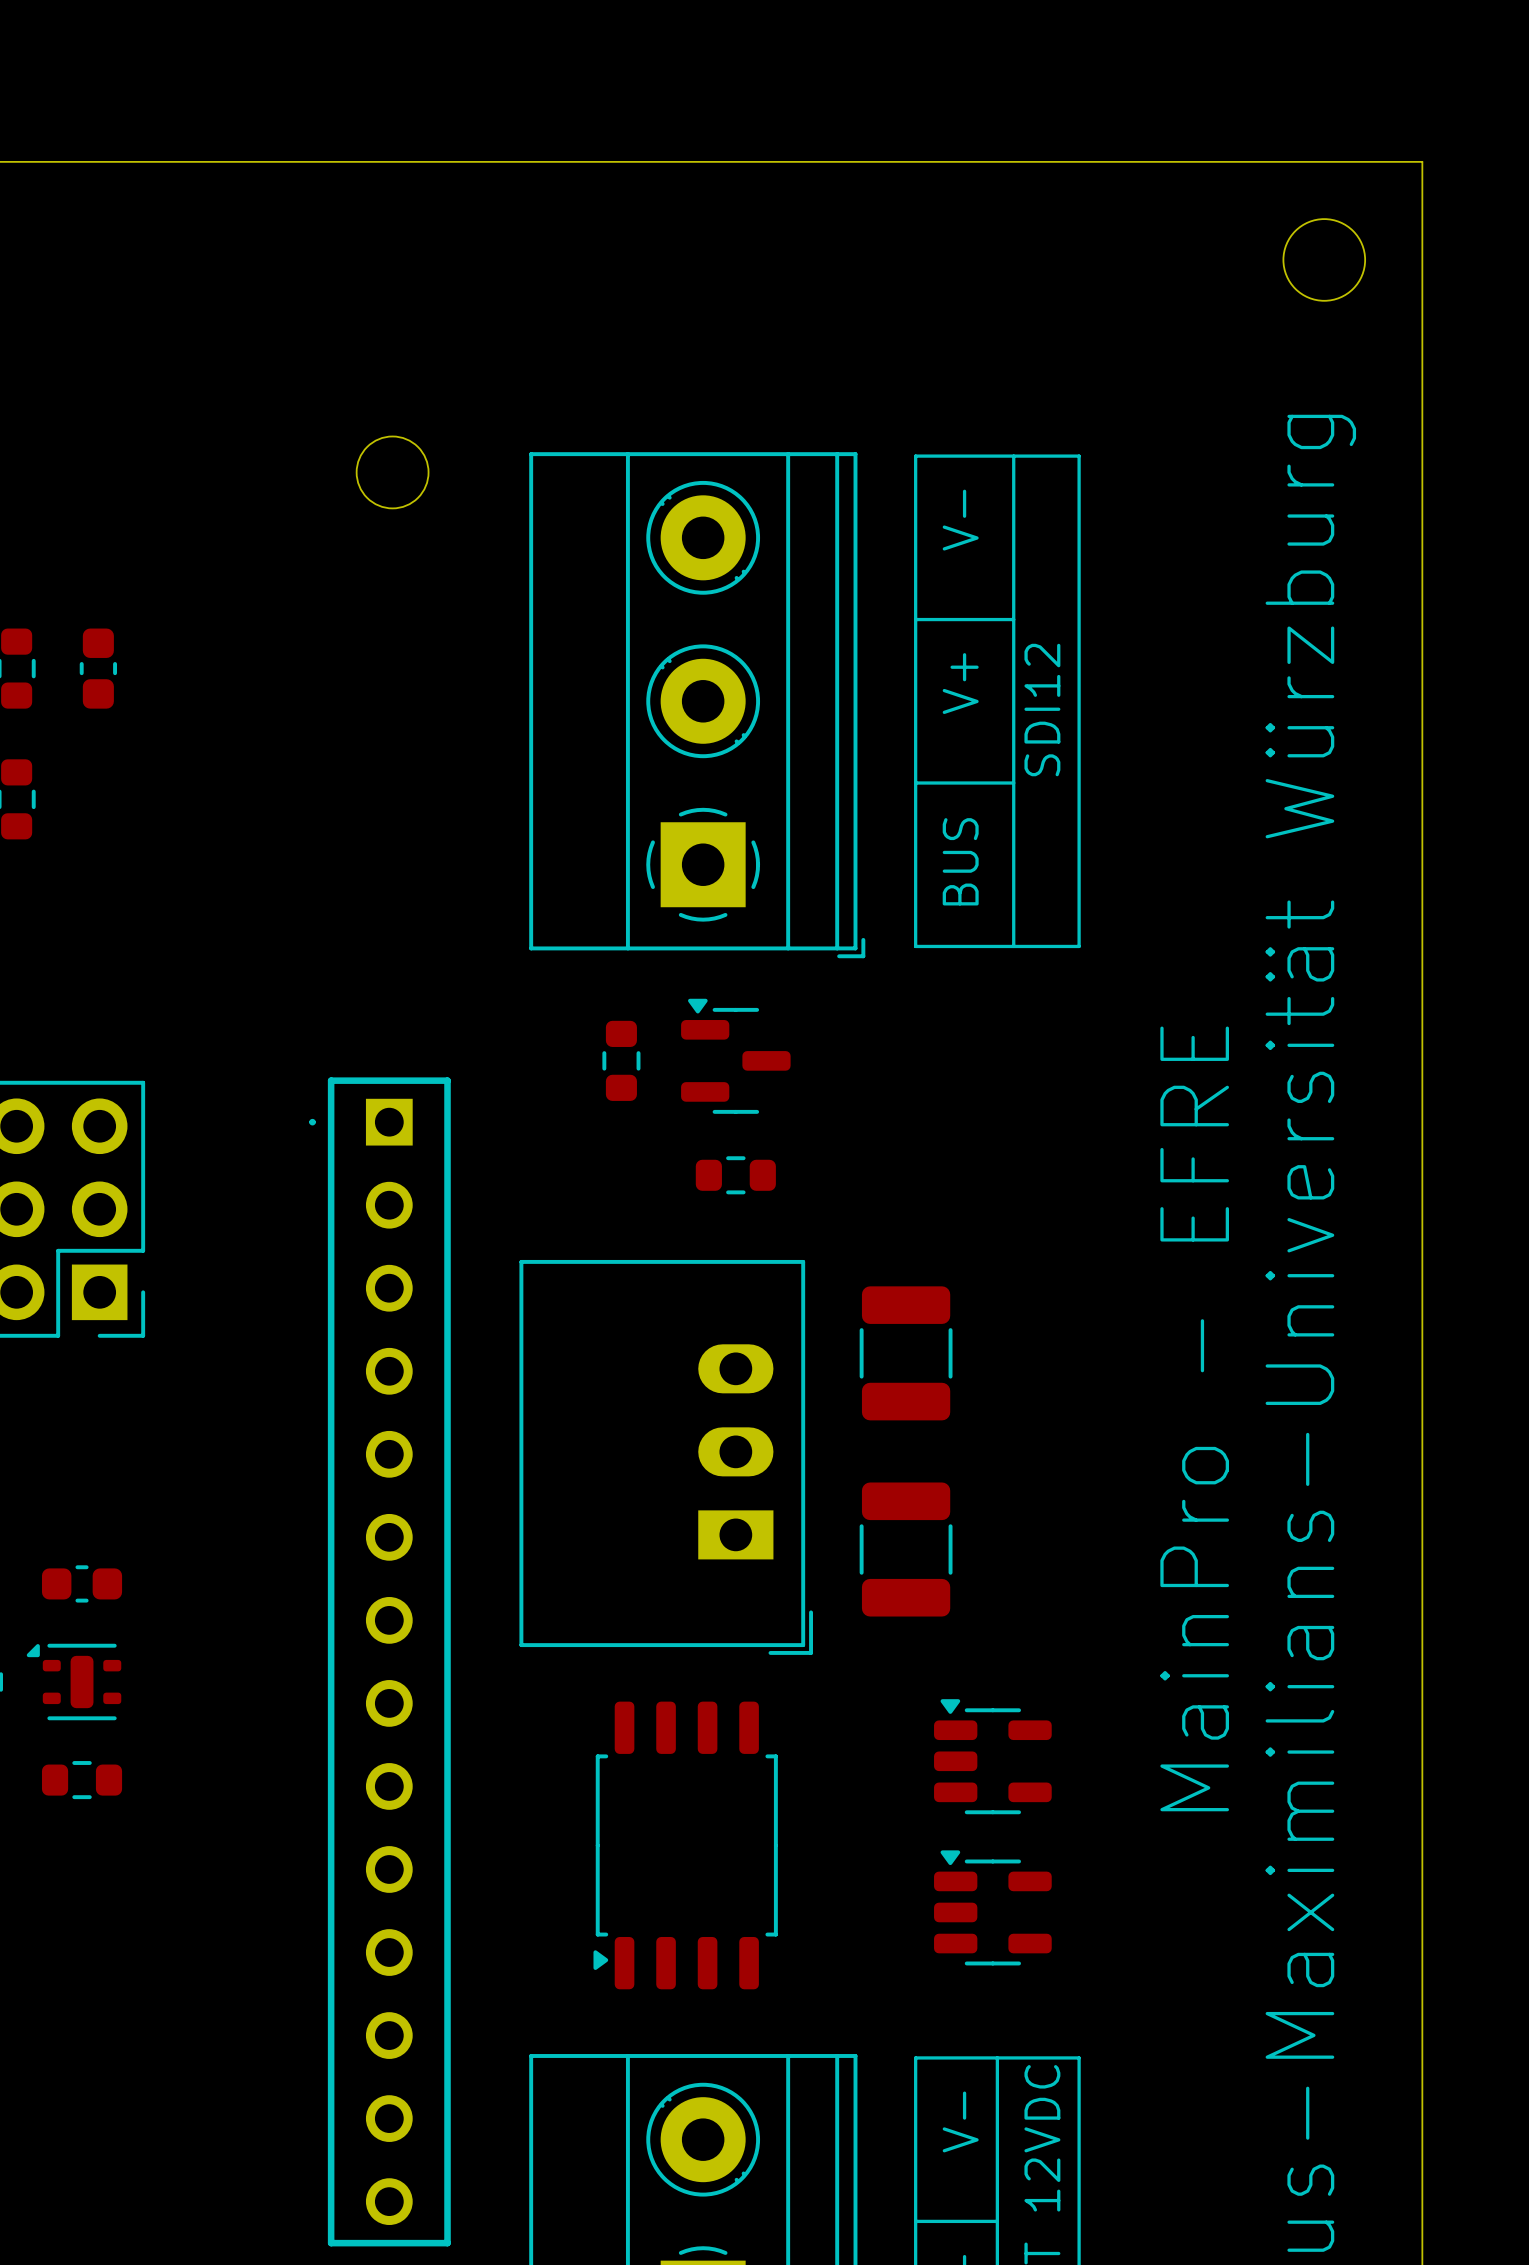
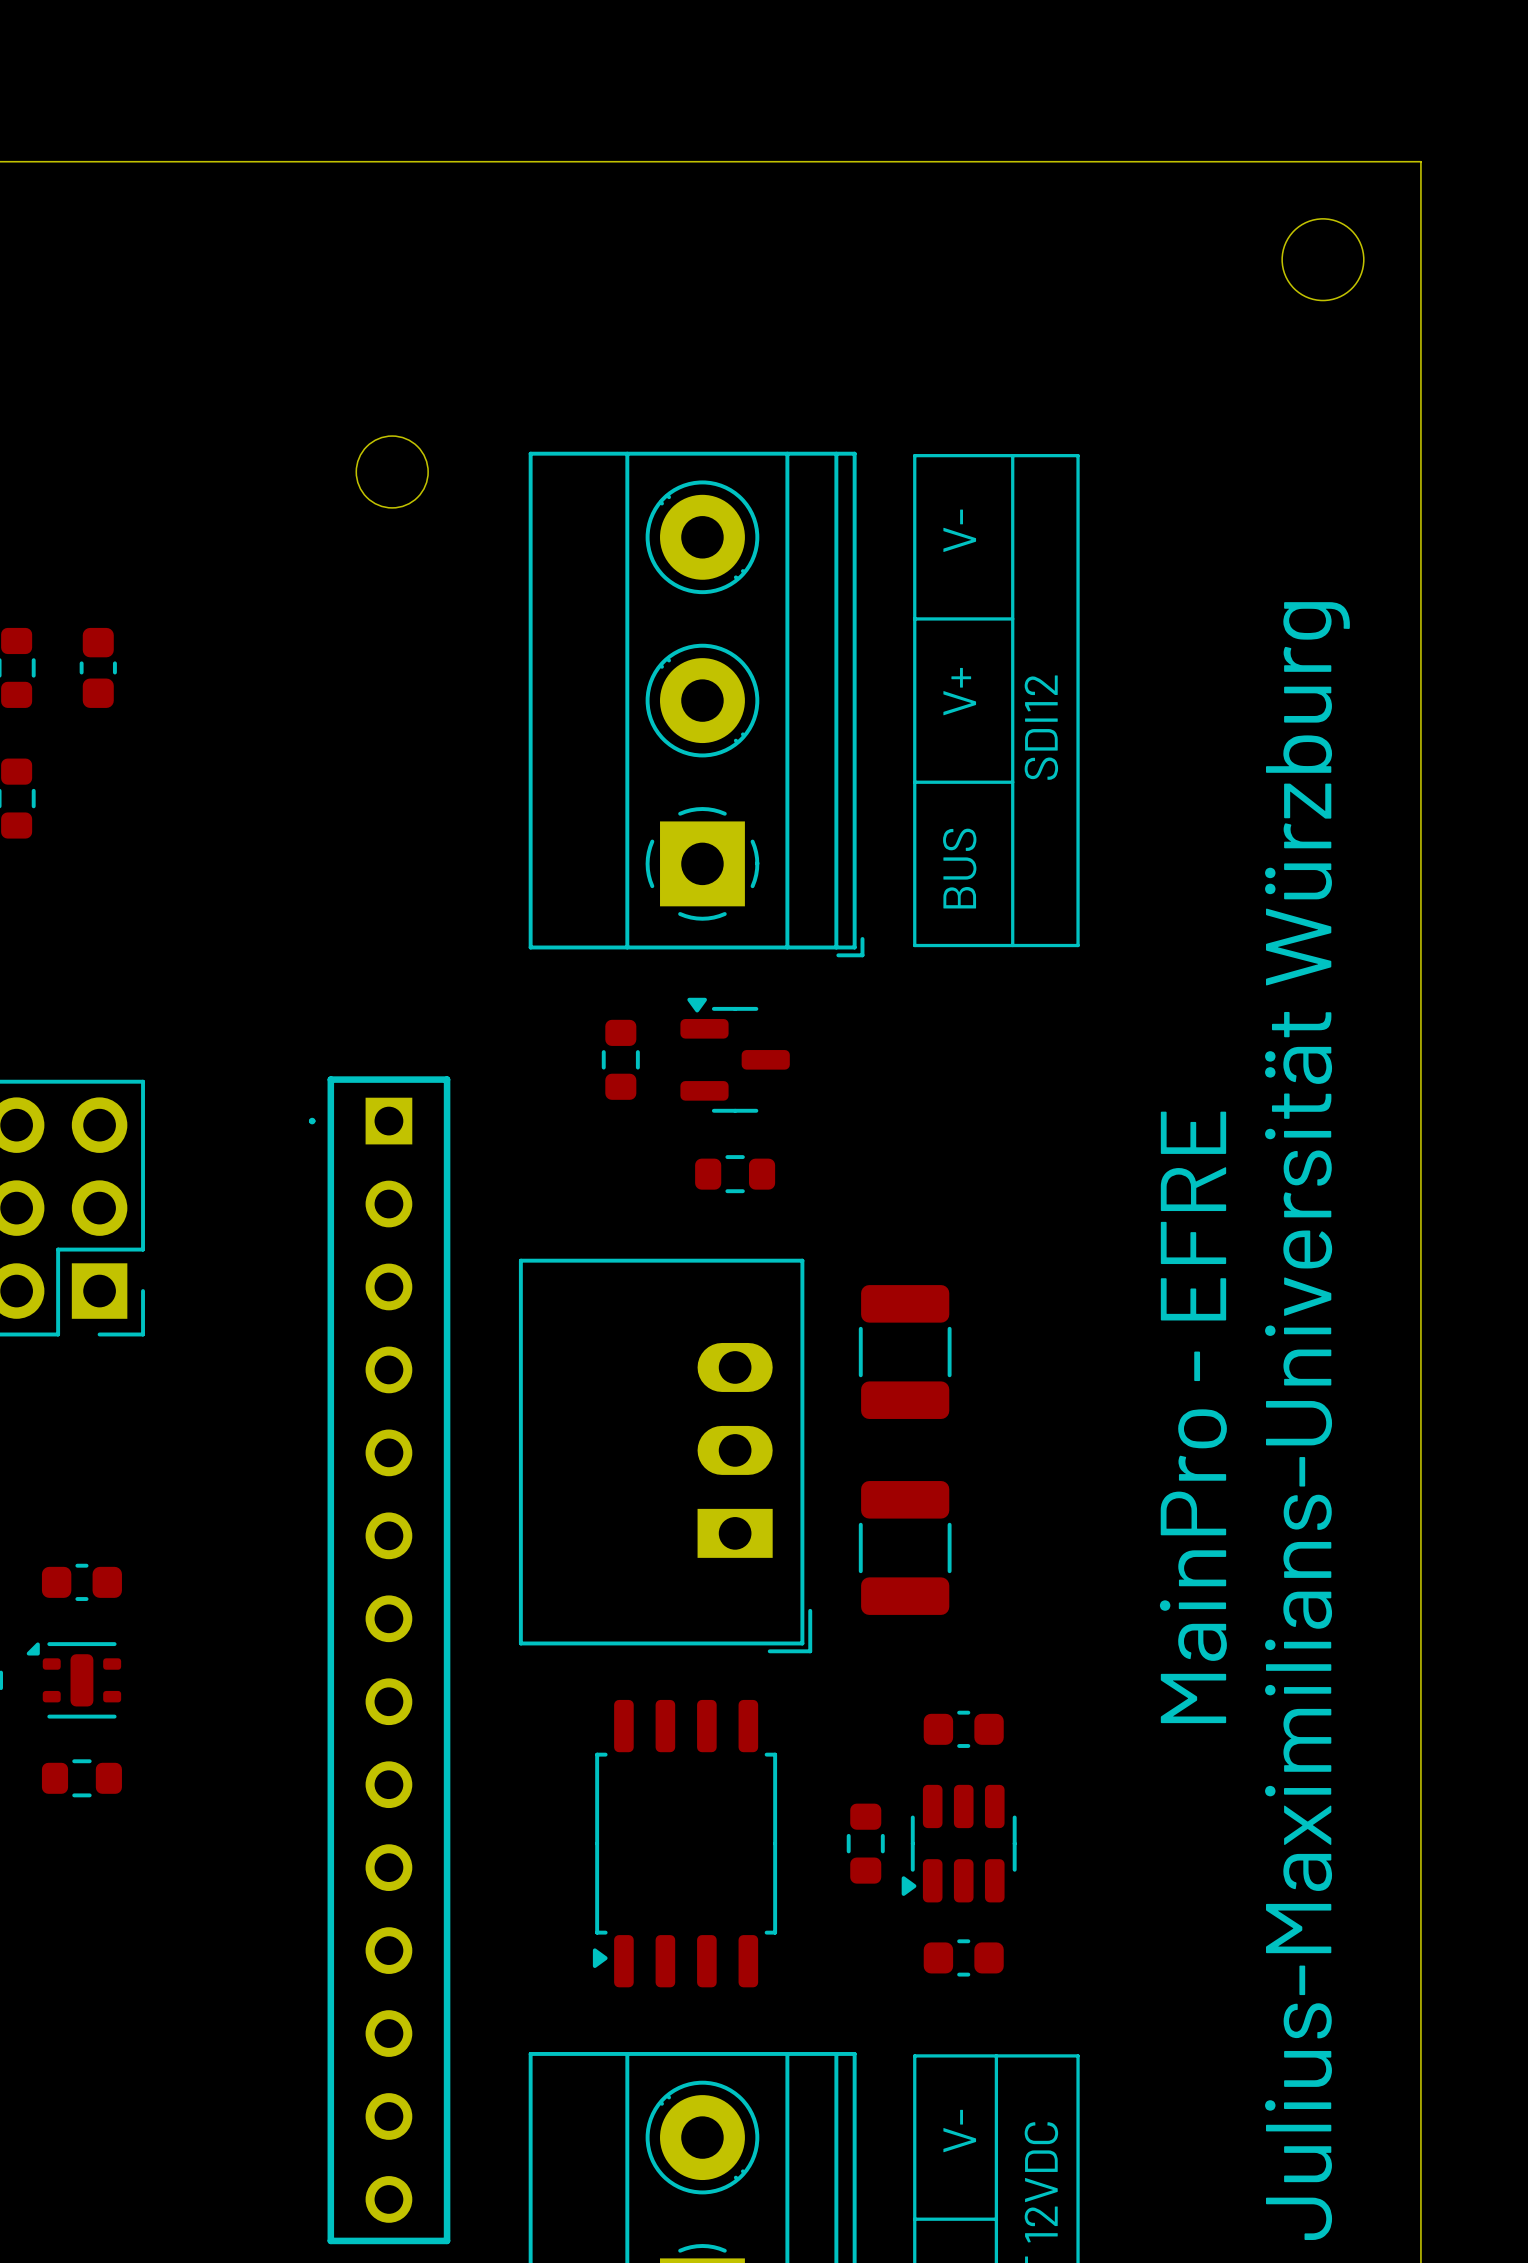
part: none -> (963, 1729)
part: (992, 1756) -> none
part: none -> (865, 1843)
part: none -> (959, 1843)
part: (992, 1907) -> none
part: none -> (963, 1957)

